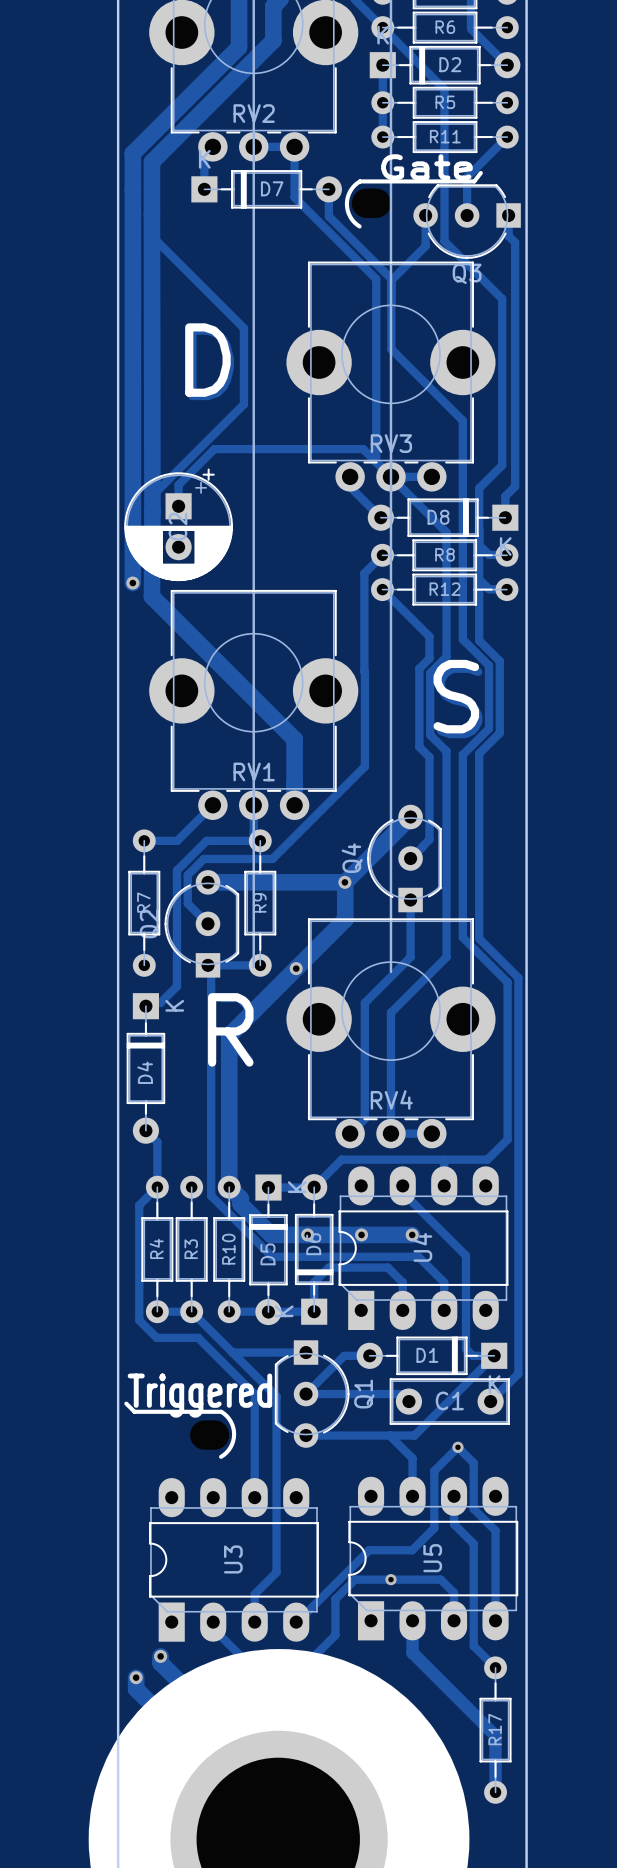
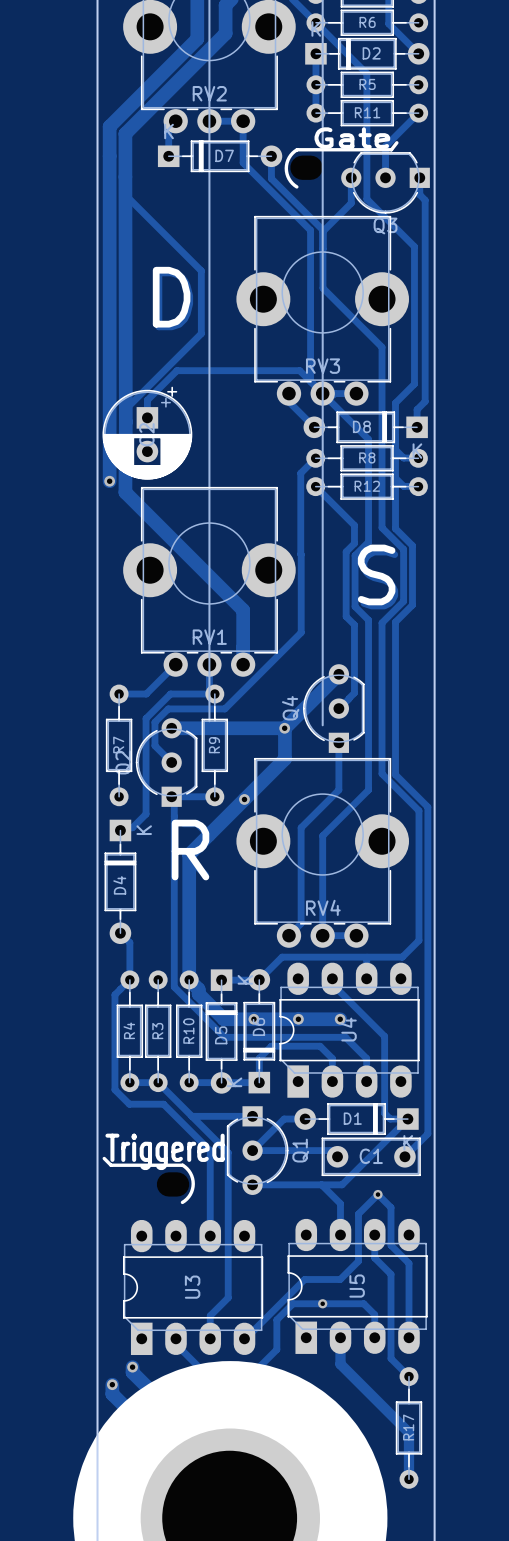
line: (253, 873) (253, 966) -> none
line: (390, 878) (390, 971) -> none

